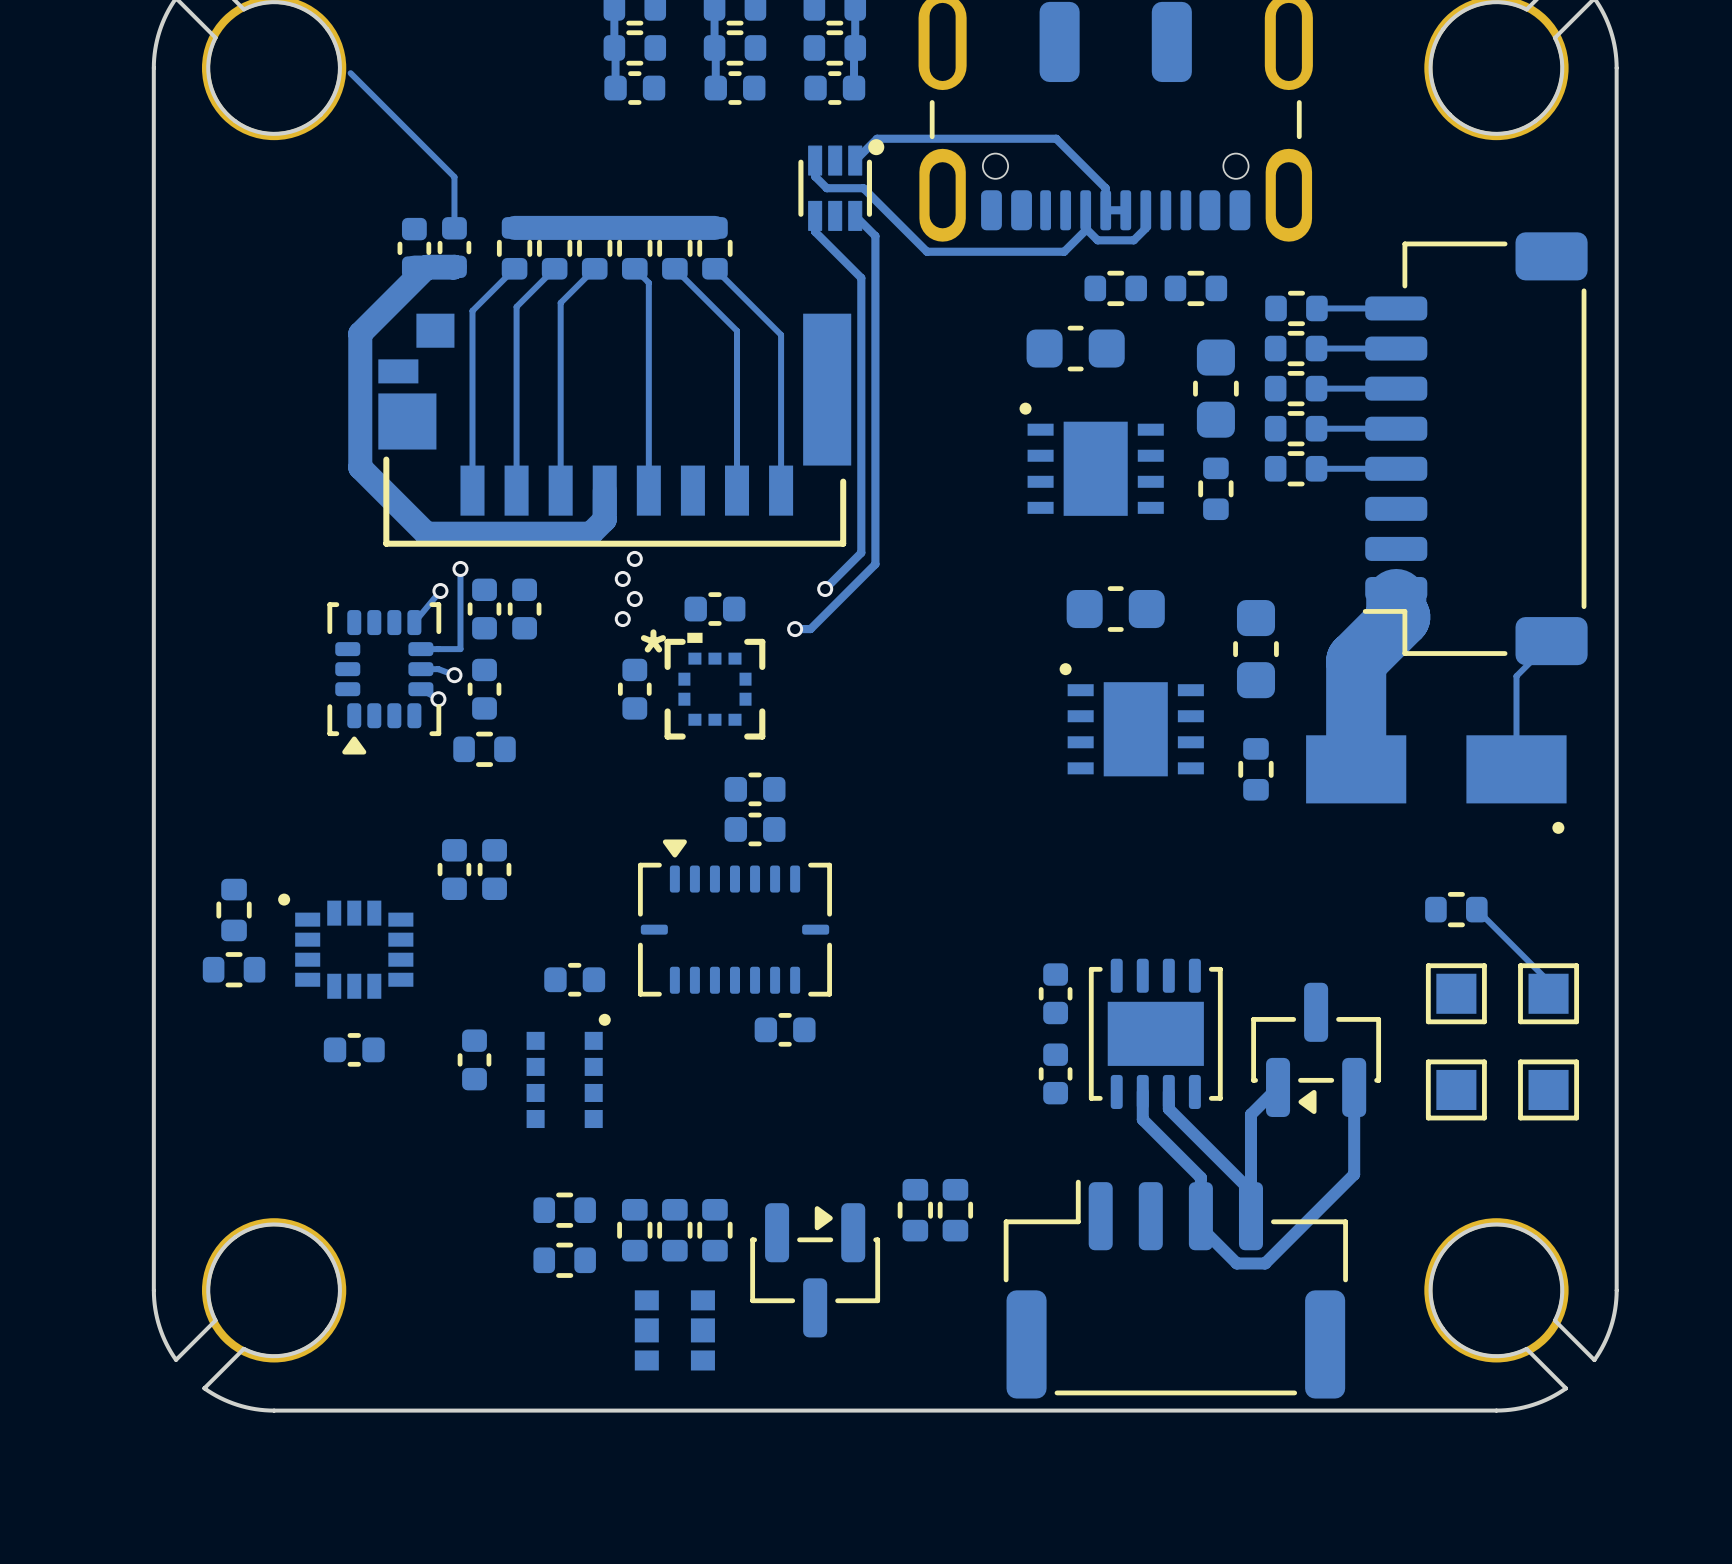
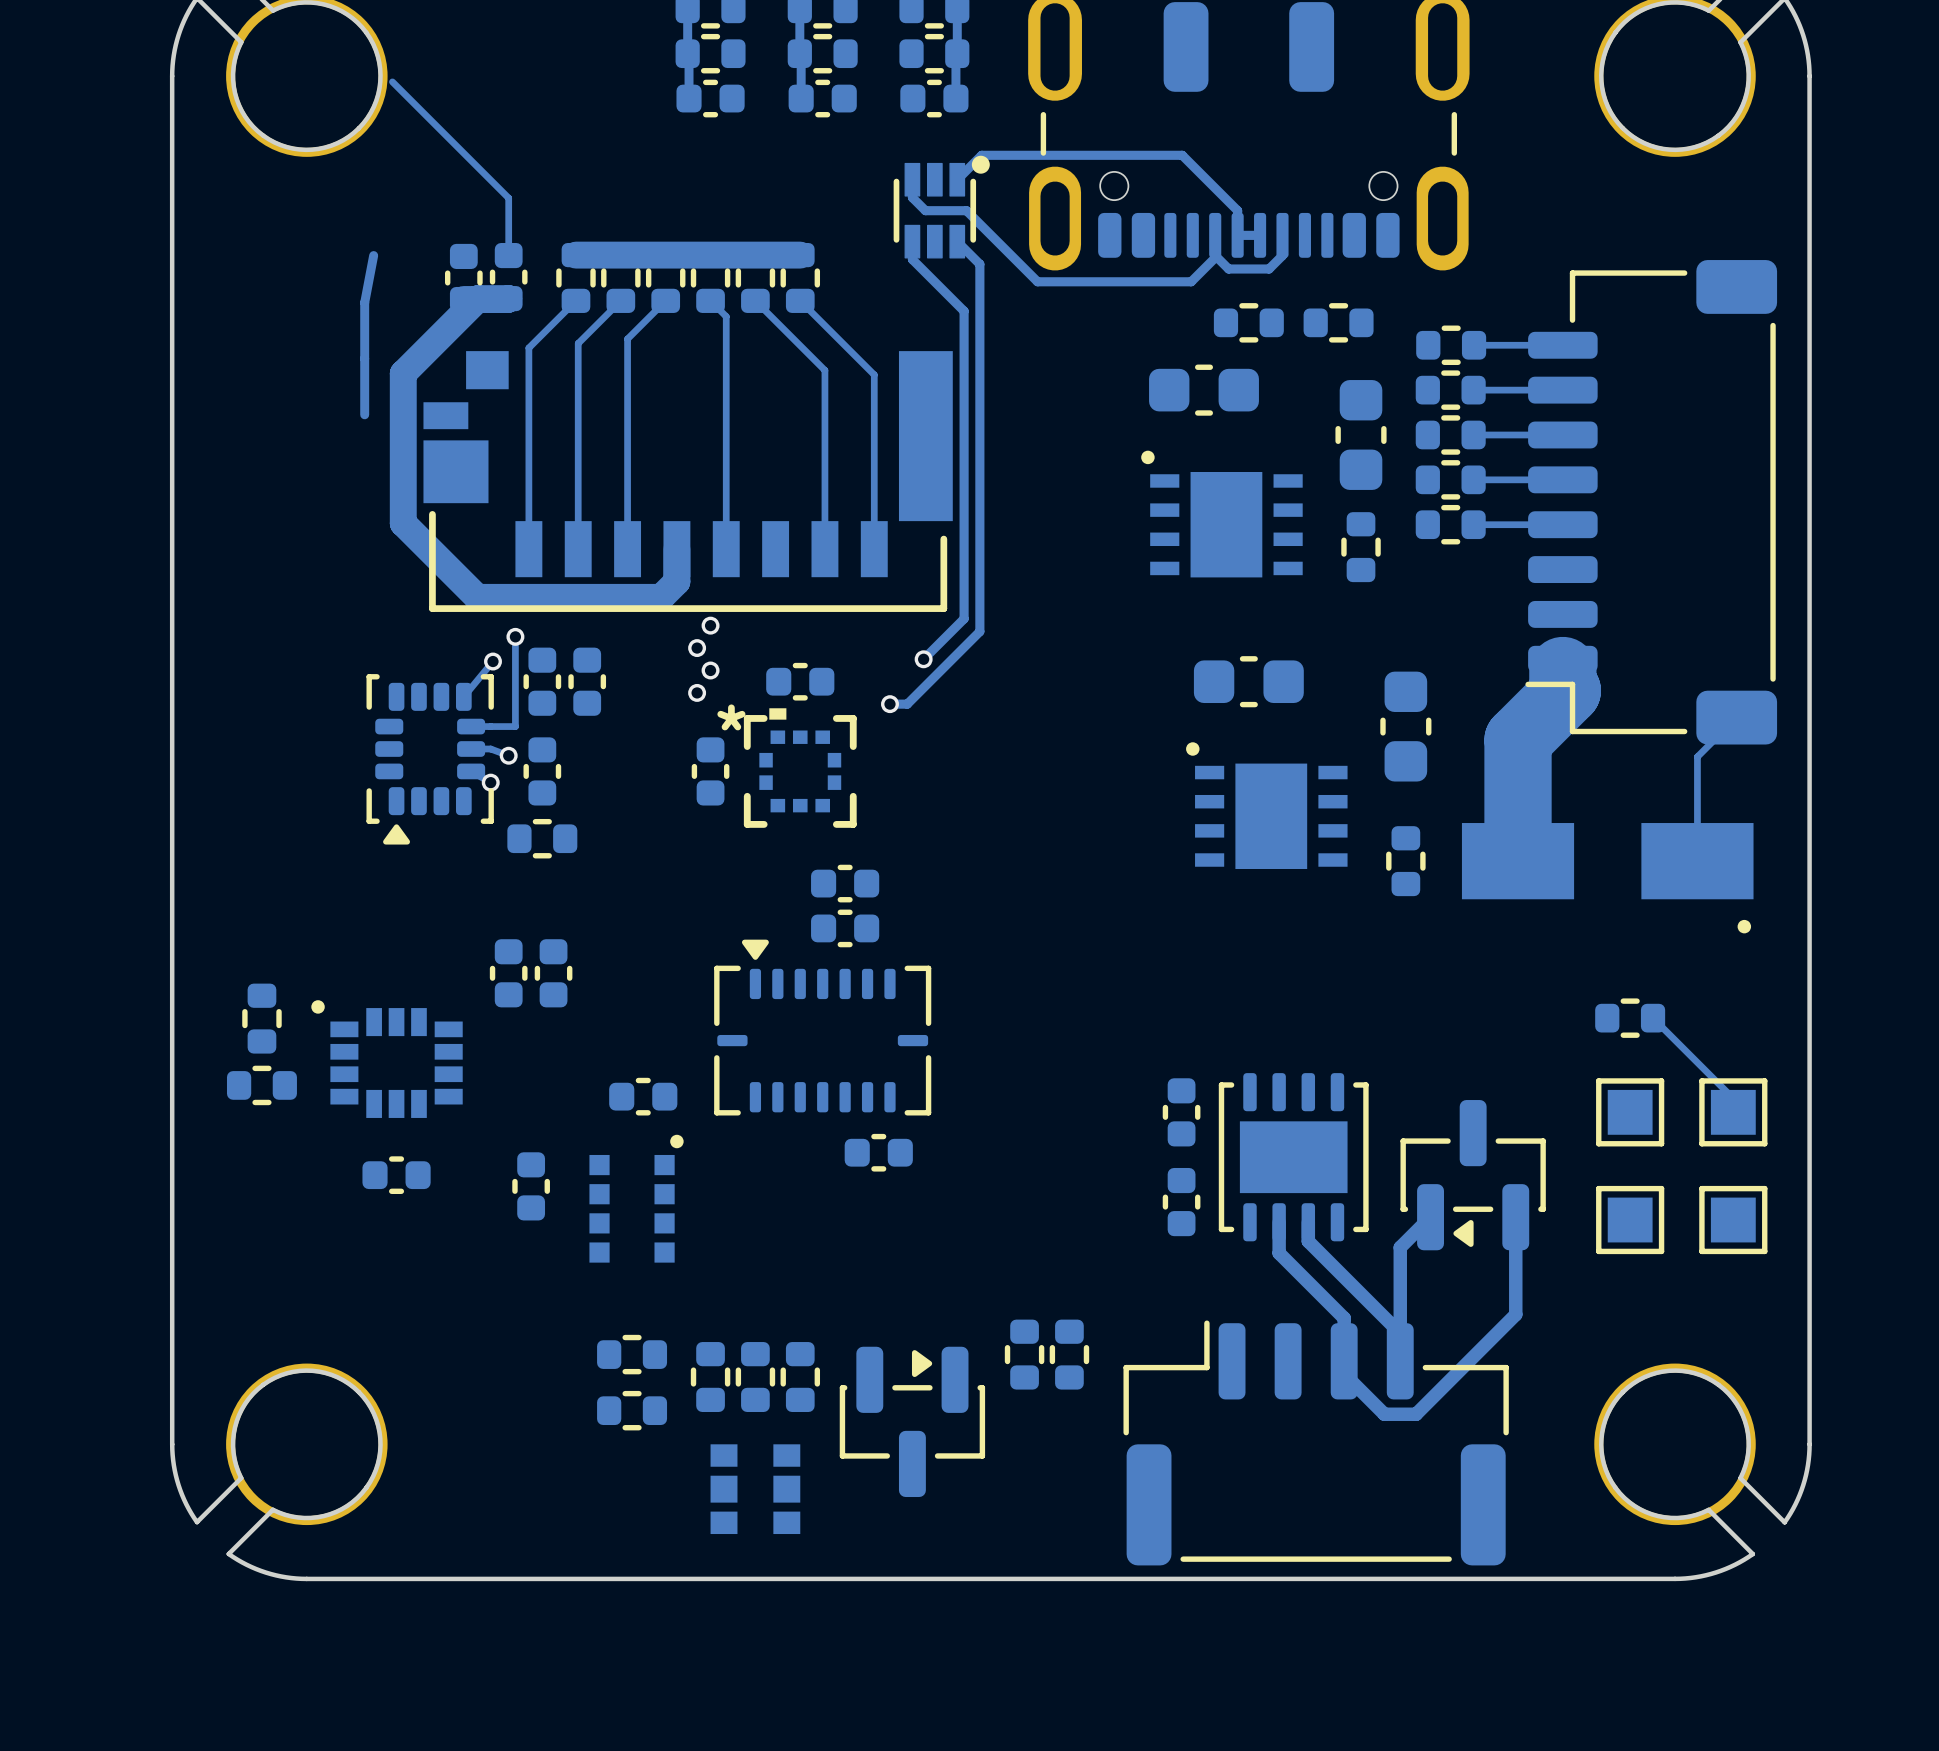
track: none -> (373, 255) (364, 302) (364, 414)

